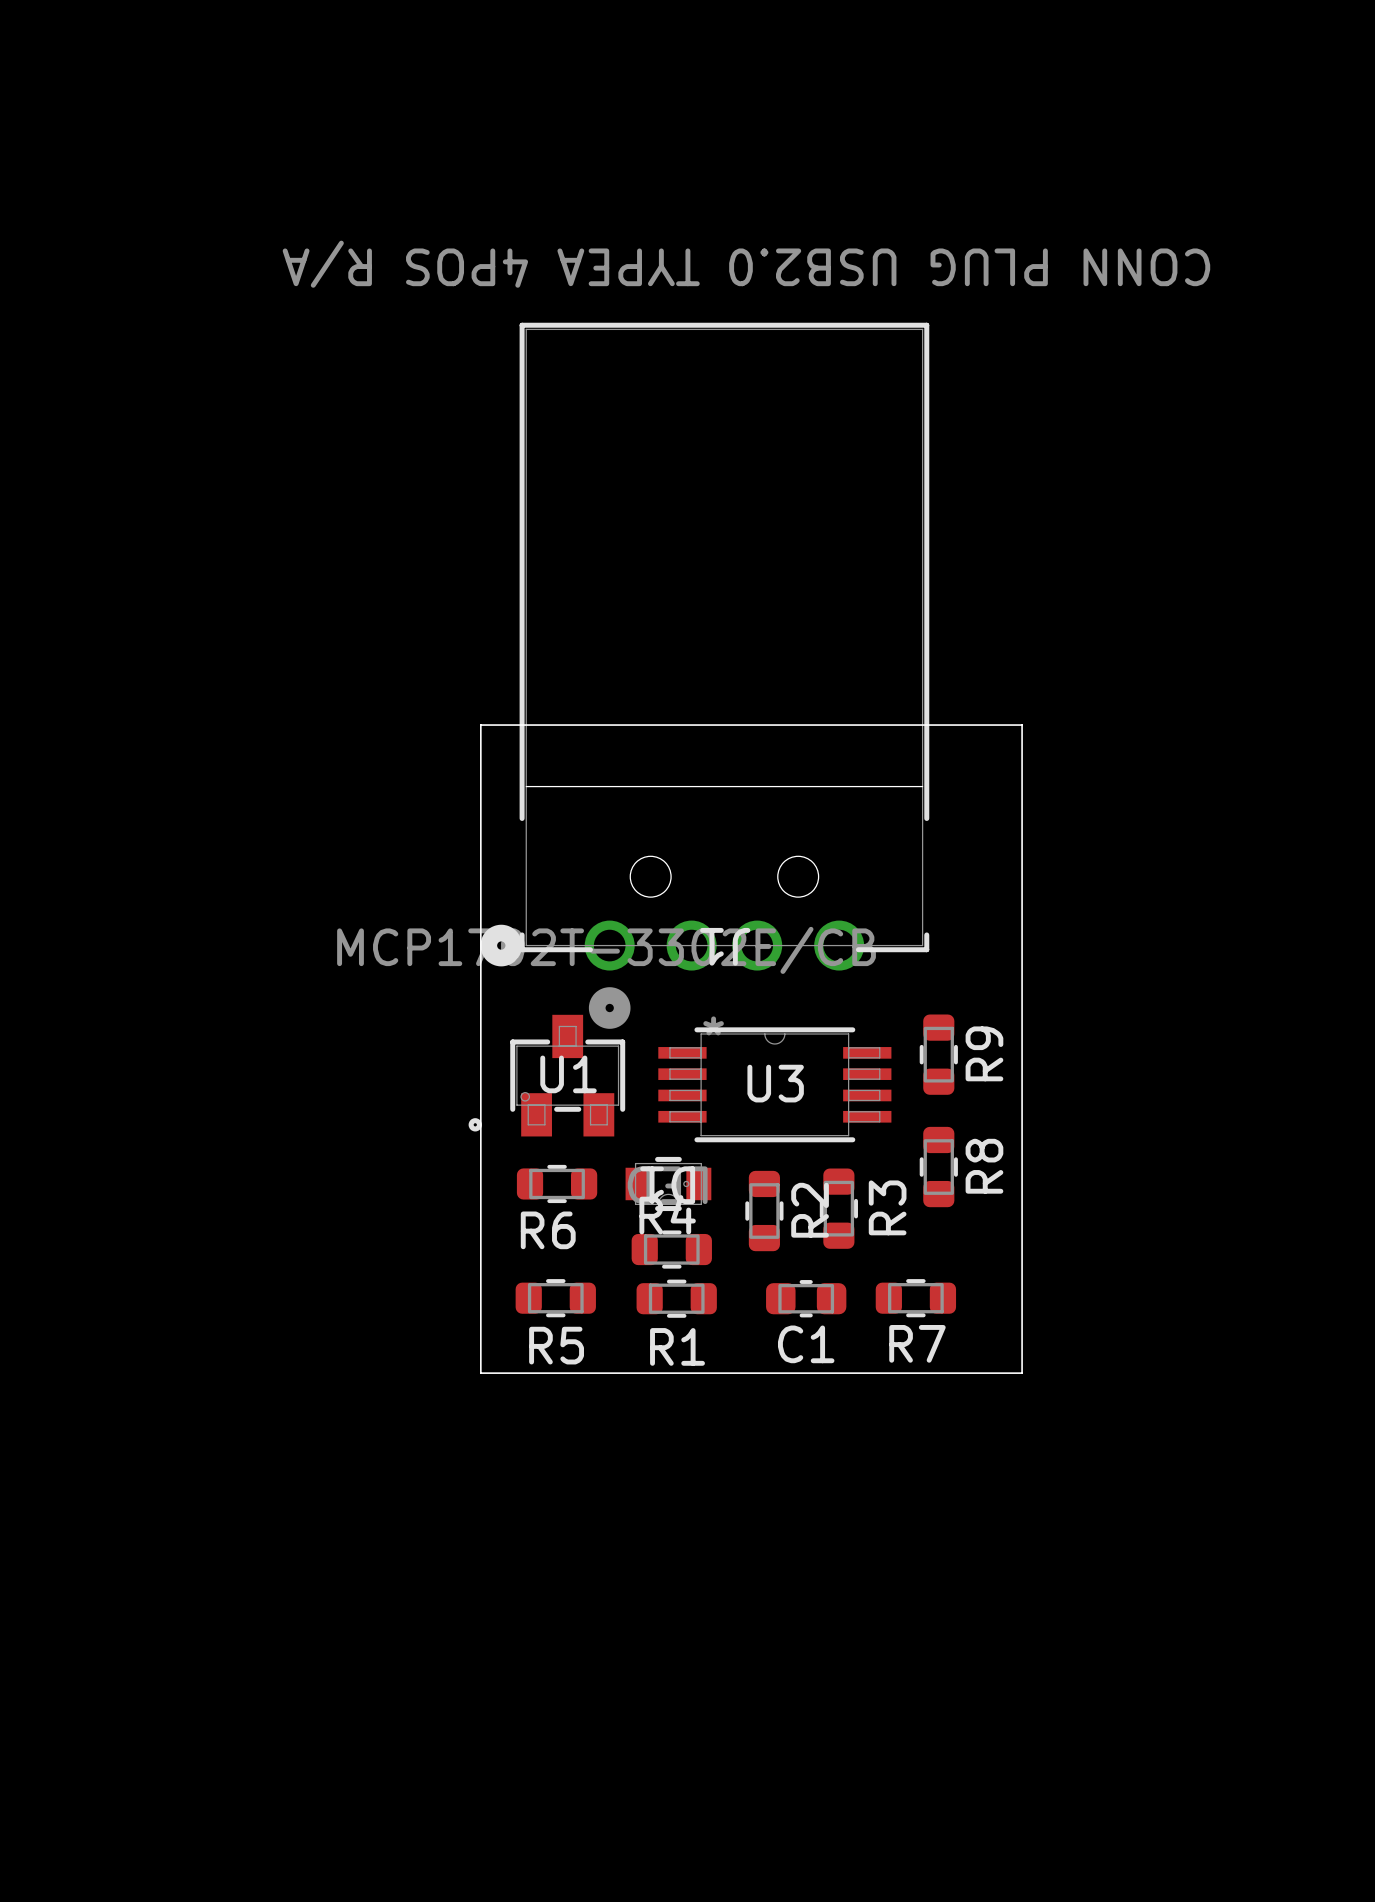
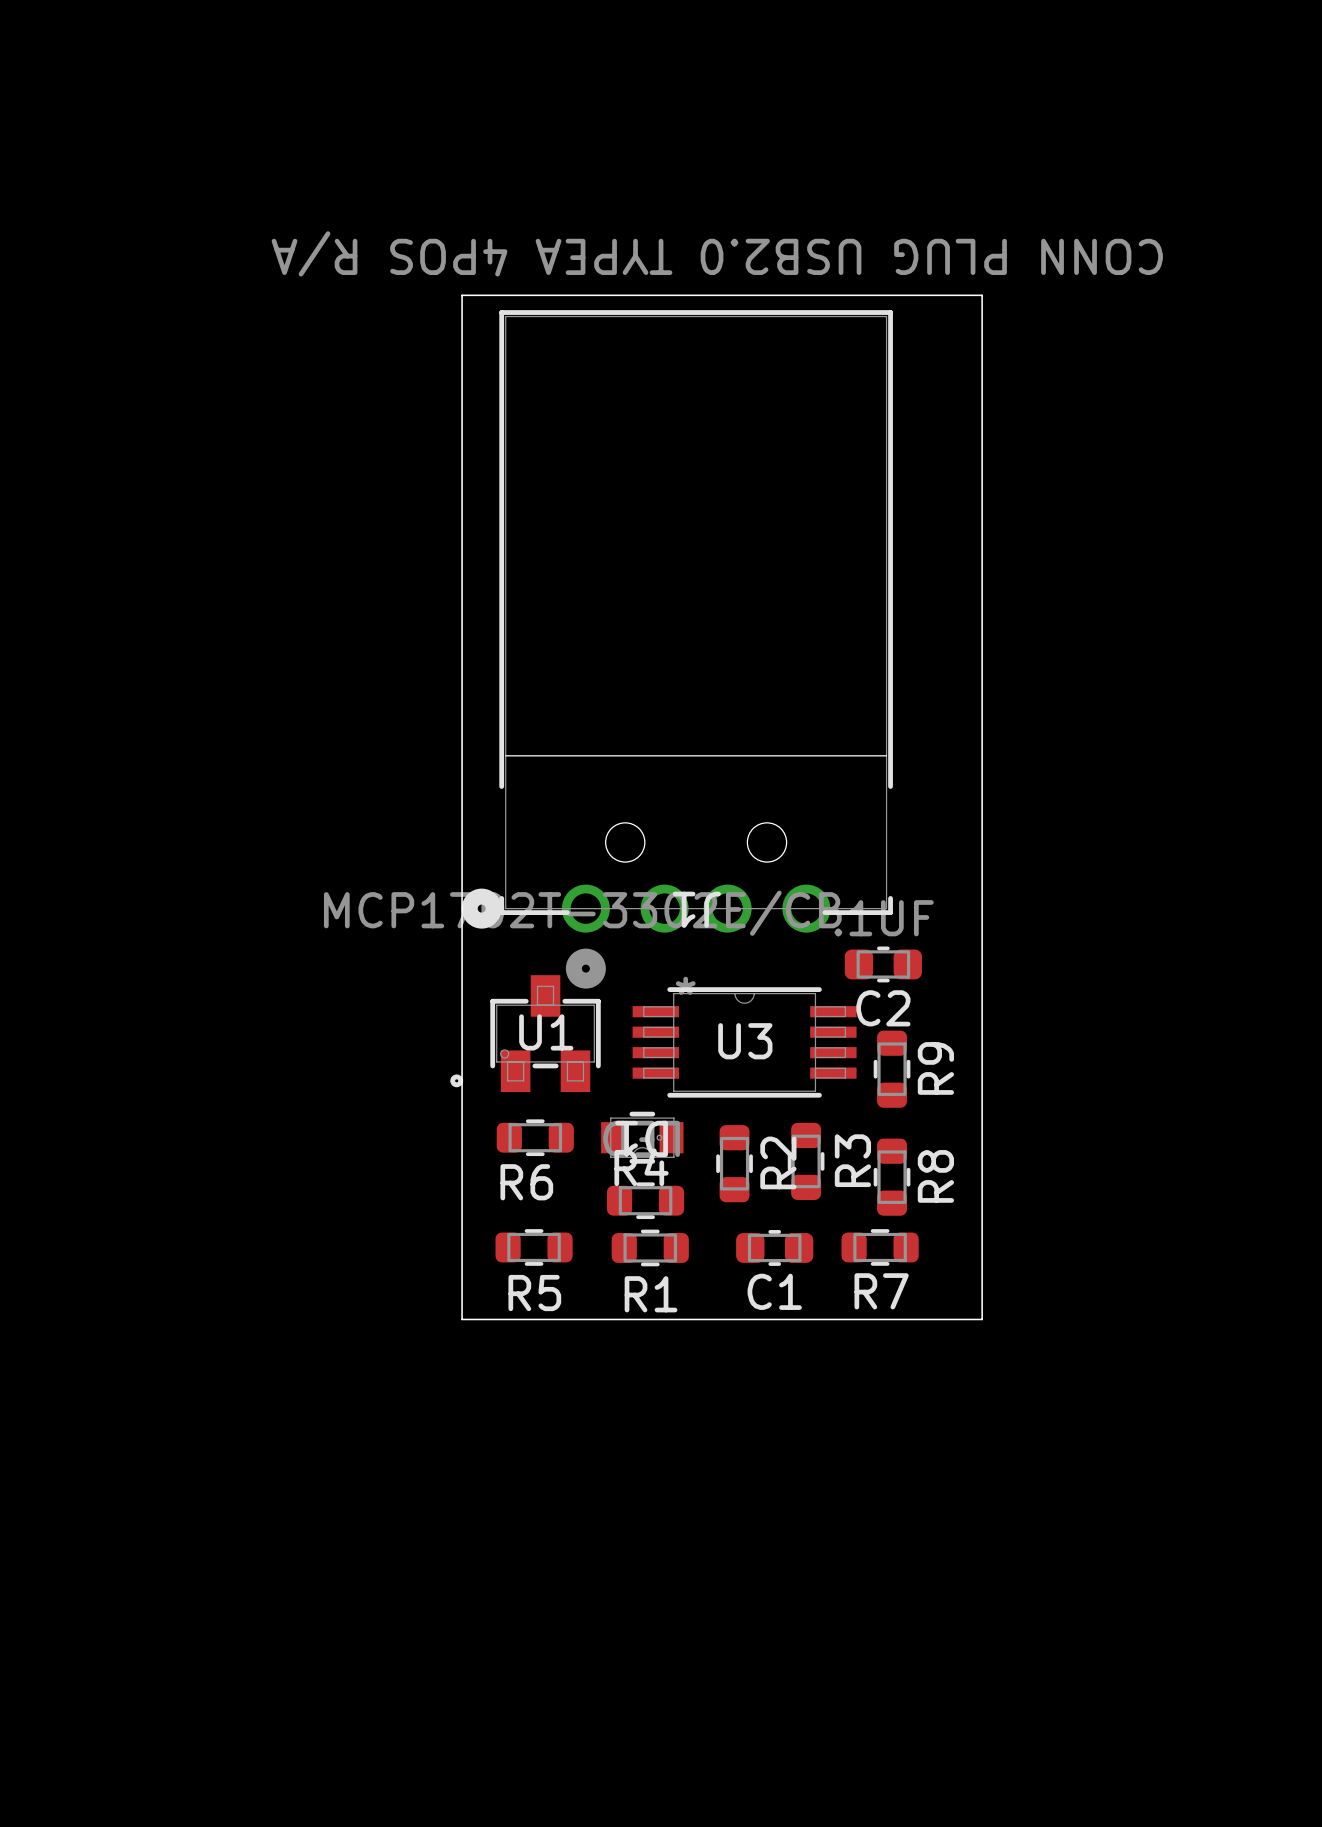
board edge: (480, 725) (1022, 725) -> (462, 696) (462, 295) (982, 295) (982, 696)
C2: none -> .1UF (883, 964)
R9 position: (938, 1054) -> (892, 1069)
R8 position: (938, 1167) -> (892, 1177)

